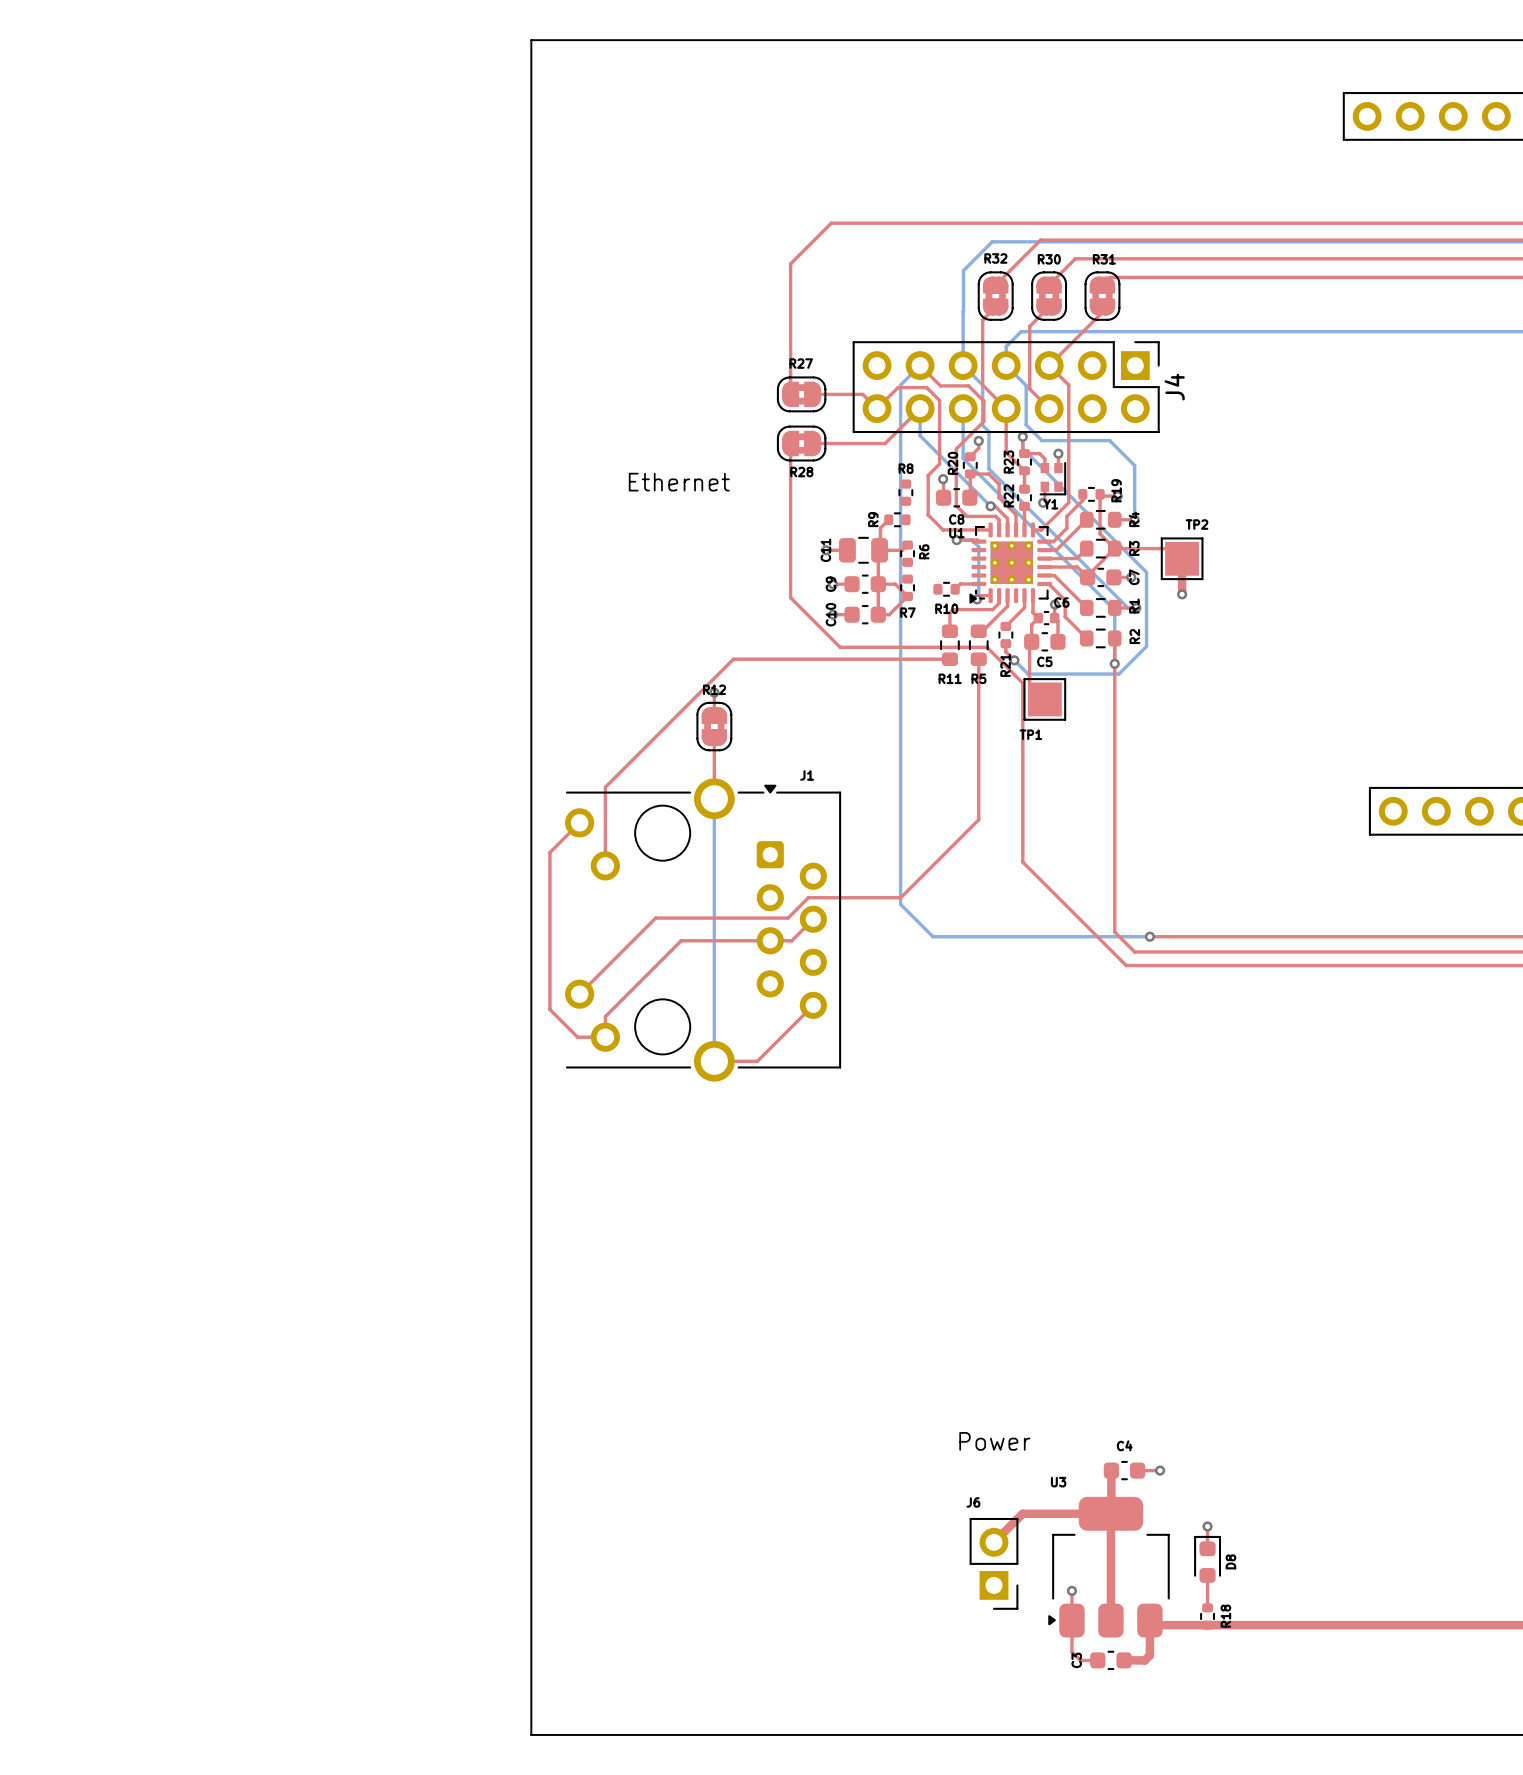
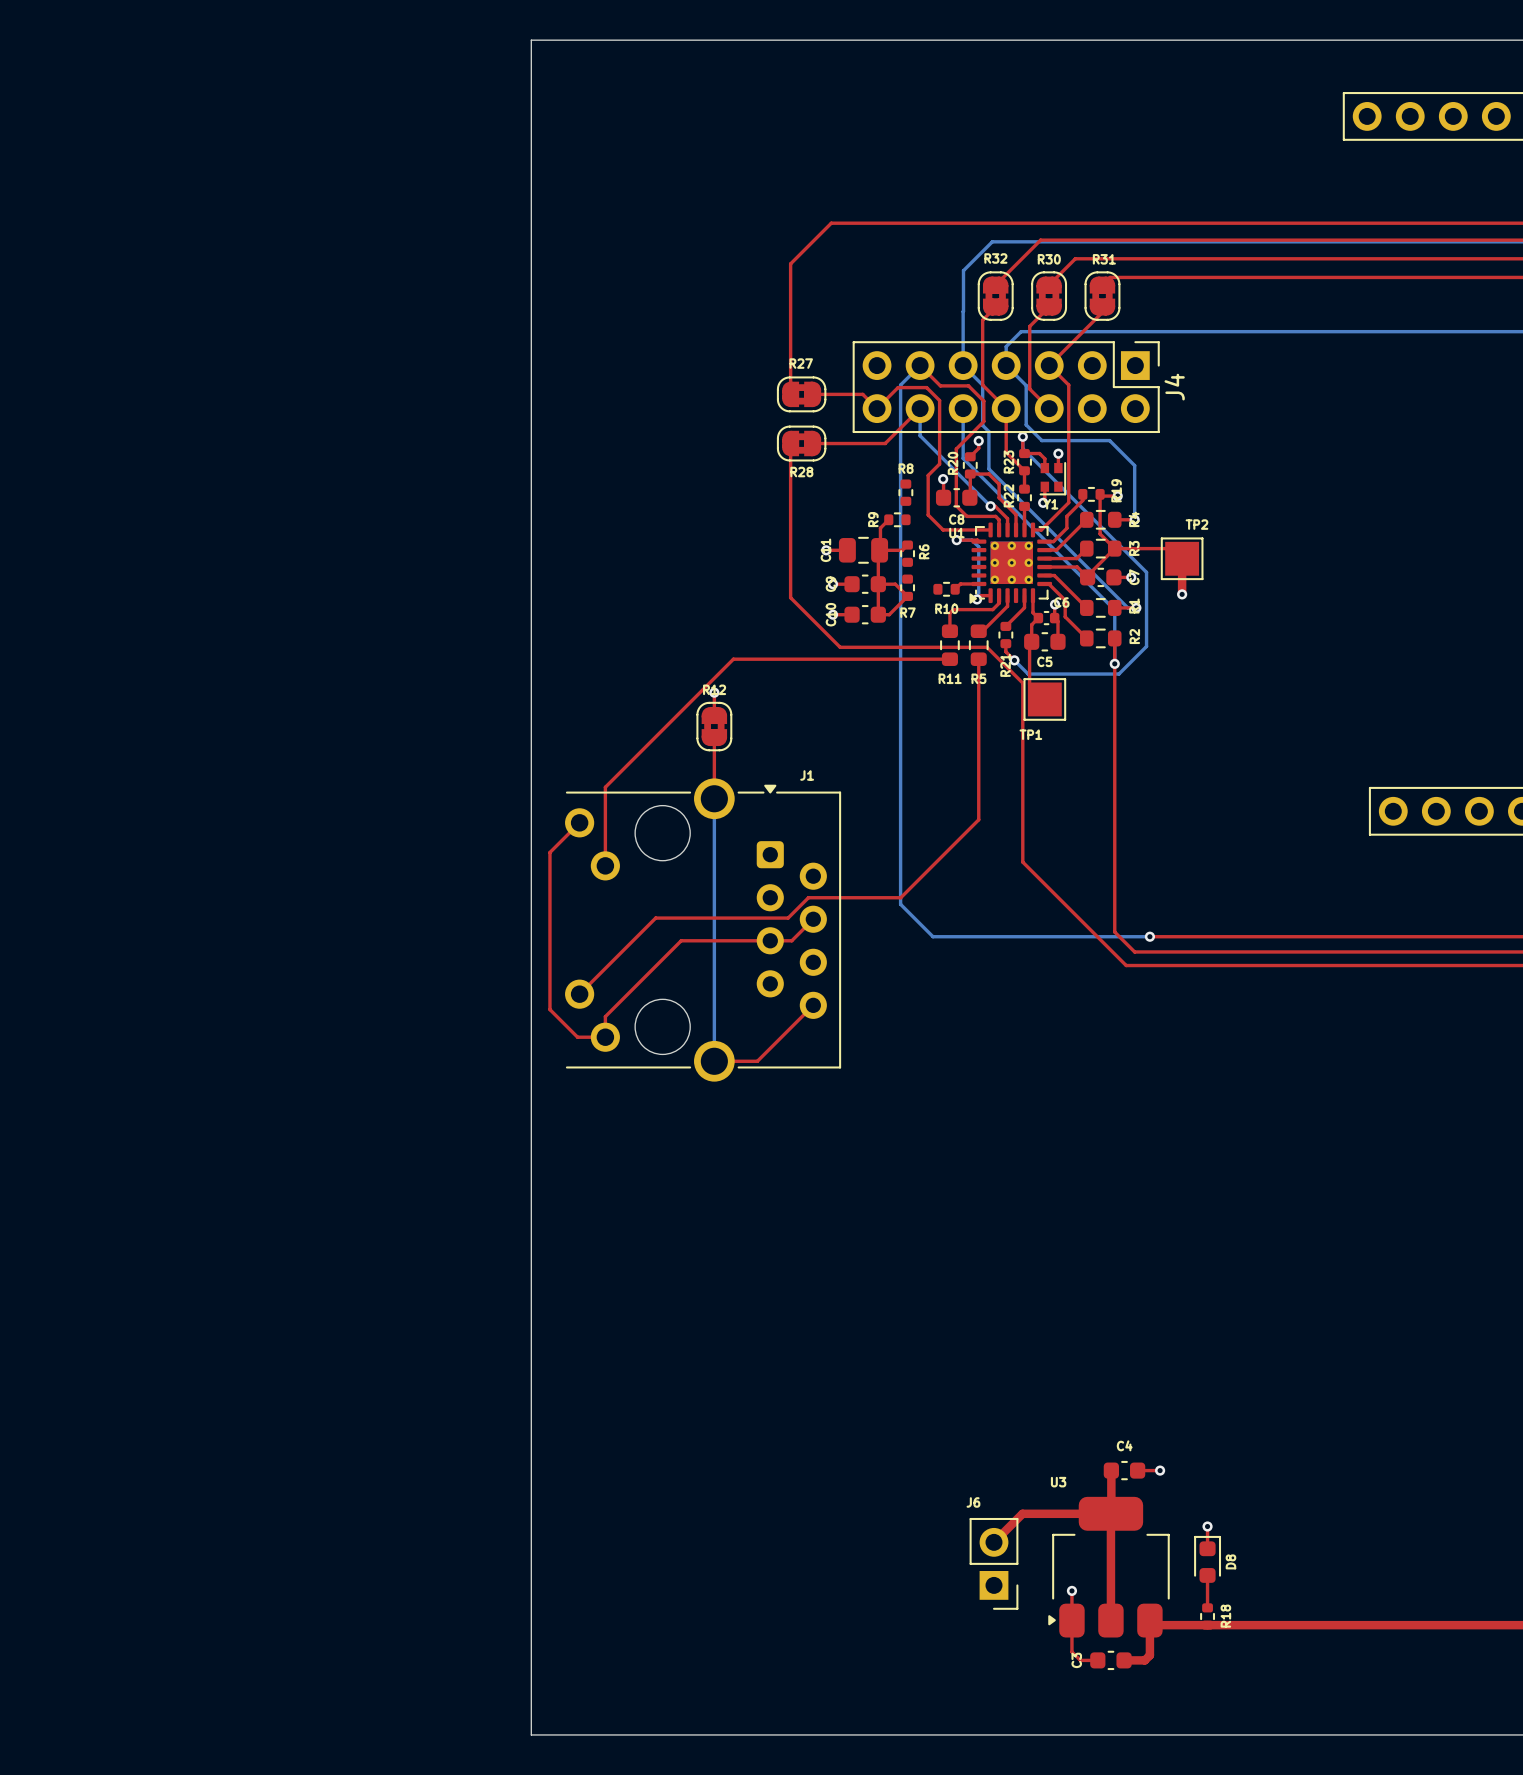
text: Ethernet (679, 482) -> none
text: Power (994, 1441) -> none

